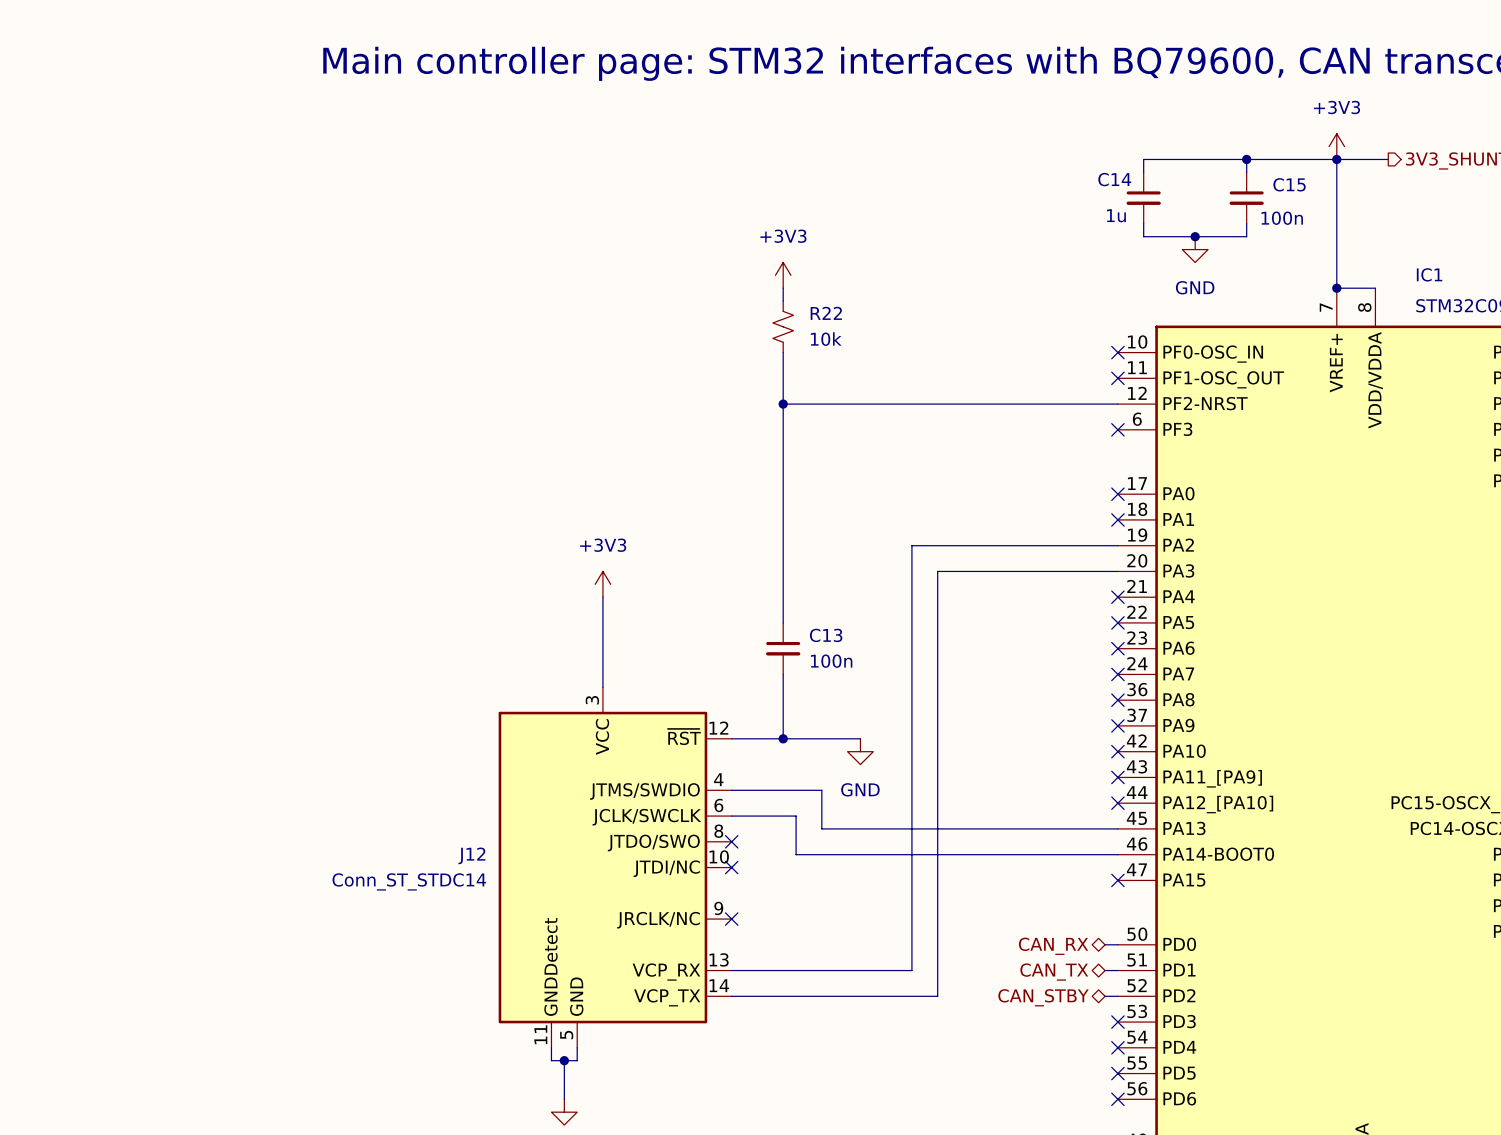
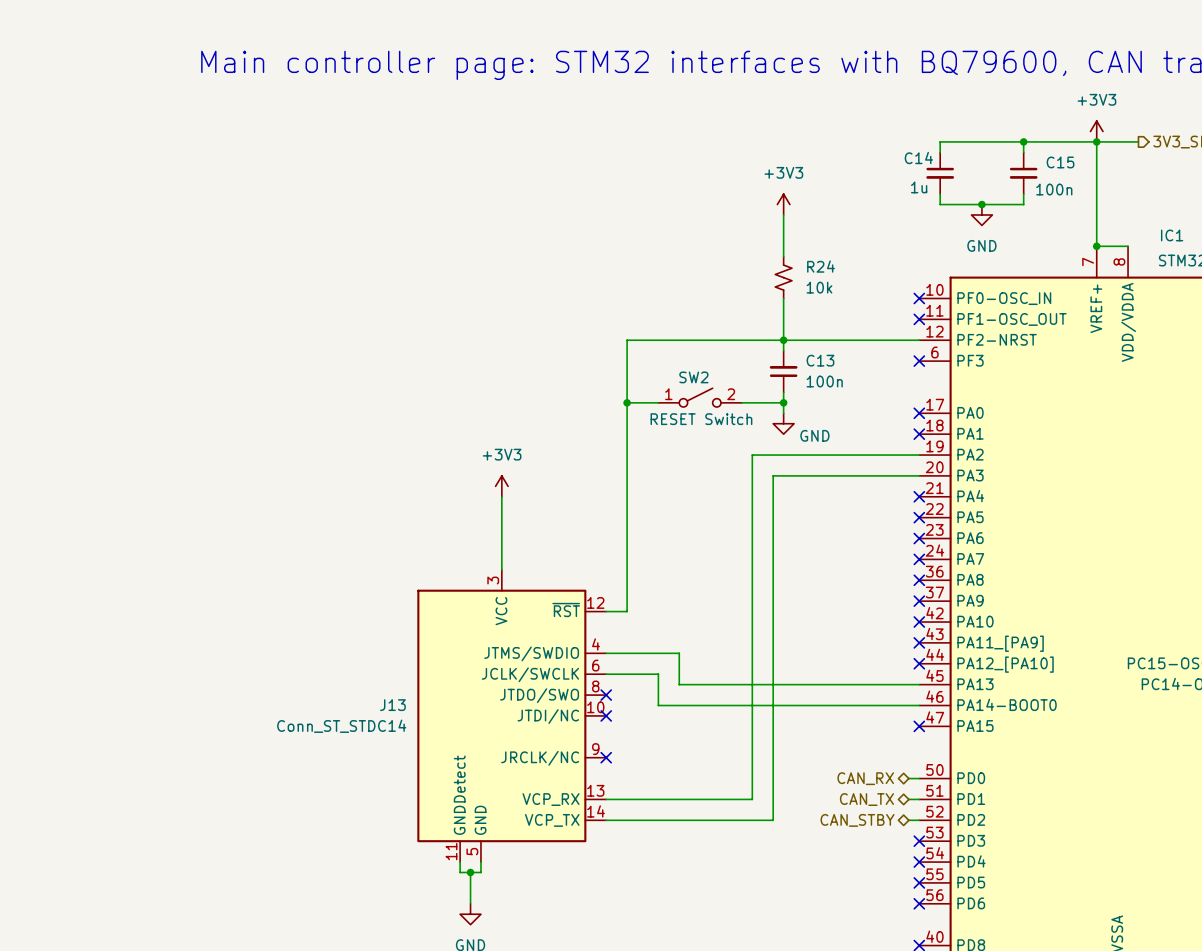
wire: none -> (783, 214) (783, 256)
power symbol position: +3V3 (783, 275) -> +3V3 (783, 204)
wire: (783, 288) (783, 301) -> none
R22: 10k (783, 326) -> none
R24: none -> 10k (783, 277)
wire: (783, 352) (783, 622) -> none
wire: none -> (783, 298) (783, 350)
junction: (783, 404) -> none
junction: none -> (783, 340)
wire: none -> (783, 392) (783, 413)
SW2: none -> RESET Switch (700, 397)
wire: none -> (627, 402) (658, 402)
junction: none -> (627, 402)
wire: none -> (741, 402) (783, 402)
junction: none -> (783, 402)
power symbol: none -> GND (783, 423)
C13 rotation: 0° (783, 648) -> 180° (783, 371)
C13 position: (783, 648) -> (783, 371)
wire: (783, 674) (783, 738) -> none
wire: (757, 738) (860, 738) -> (627, 611) (627, 340) (647, 340)
junction: (783, 738) -> none
power symbol: GND (860, 751) -> none
J12 name: J12 (471, 855) -> J13 (392, 705)

